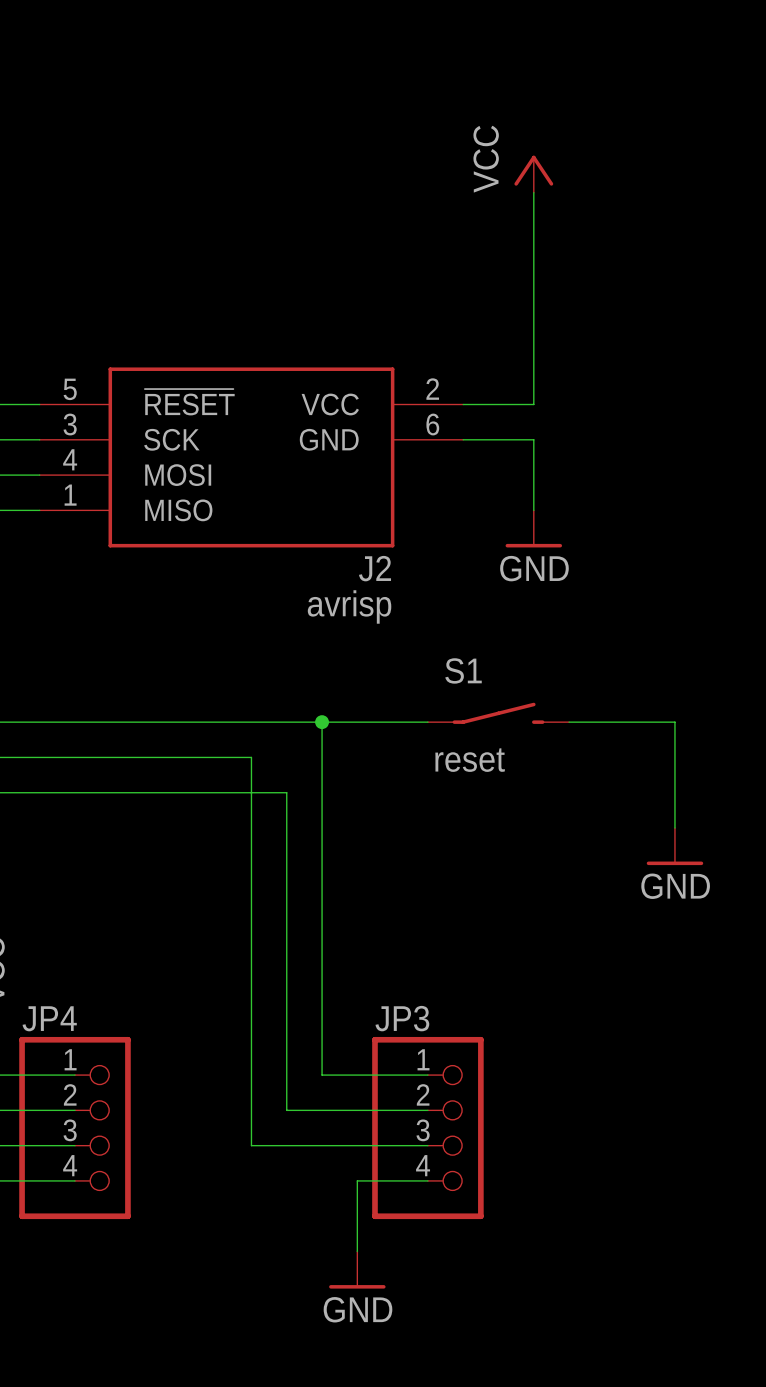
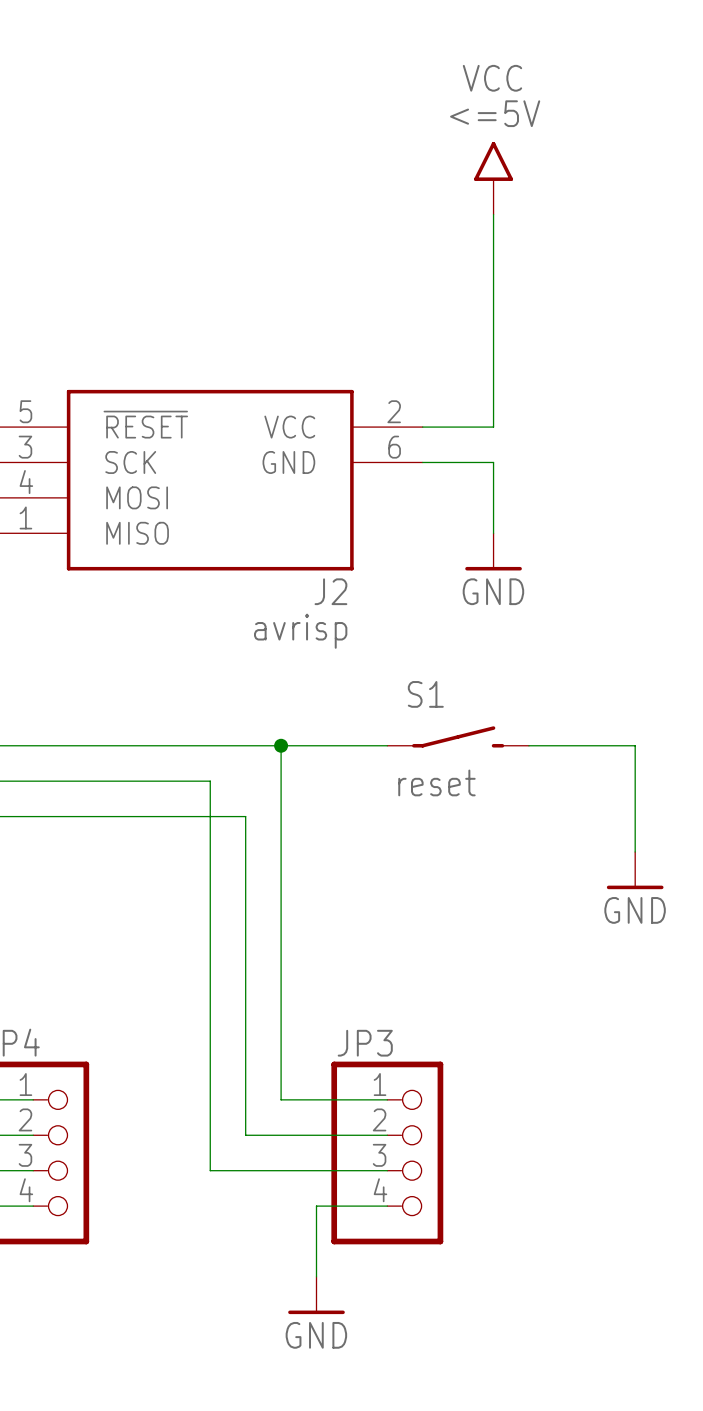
power symbol: none -> <=5V (493, 178)
power symbol: VCC (533, 174) -> none

